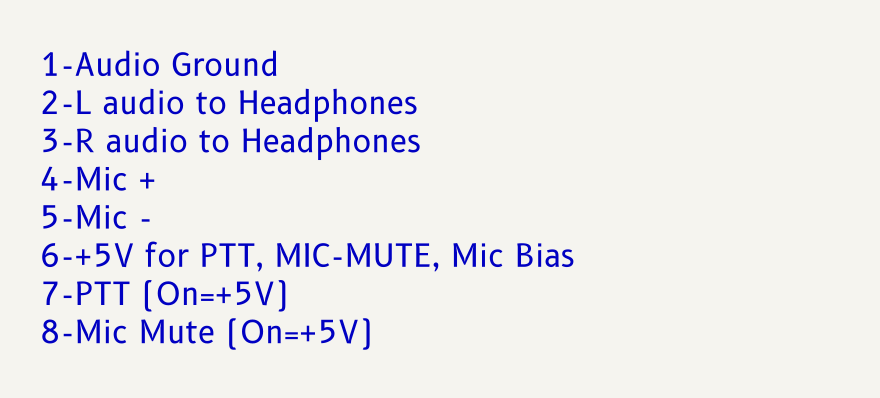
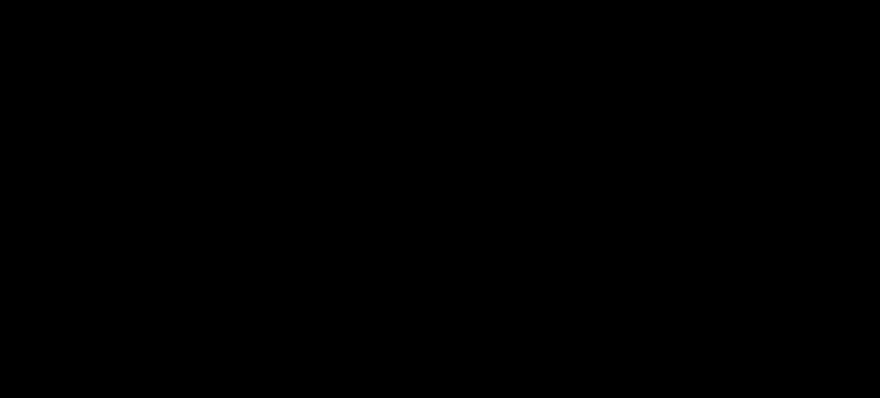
text: 1-Audio Ground (159, 63) -> none
text: 2-L audio to Headphones (229, 105) -> none
text: 3-R audio to Headphones (231, 143) -> none
text: 4-Mic + (98, 178) -> none
text: 5-Mic - (96, 216) -> none
text: 6-+5V for PTT, MIC-MUTE, Mic Bias (307, 256) -> none
text: 7-PTT (On=+5V) (164, 295) -> none
text: 8-Mic Mute (On=+5V) (205, 333) -> none

